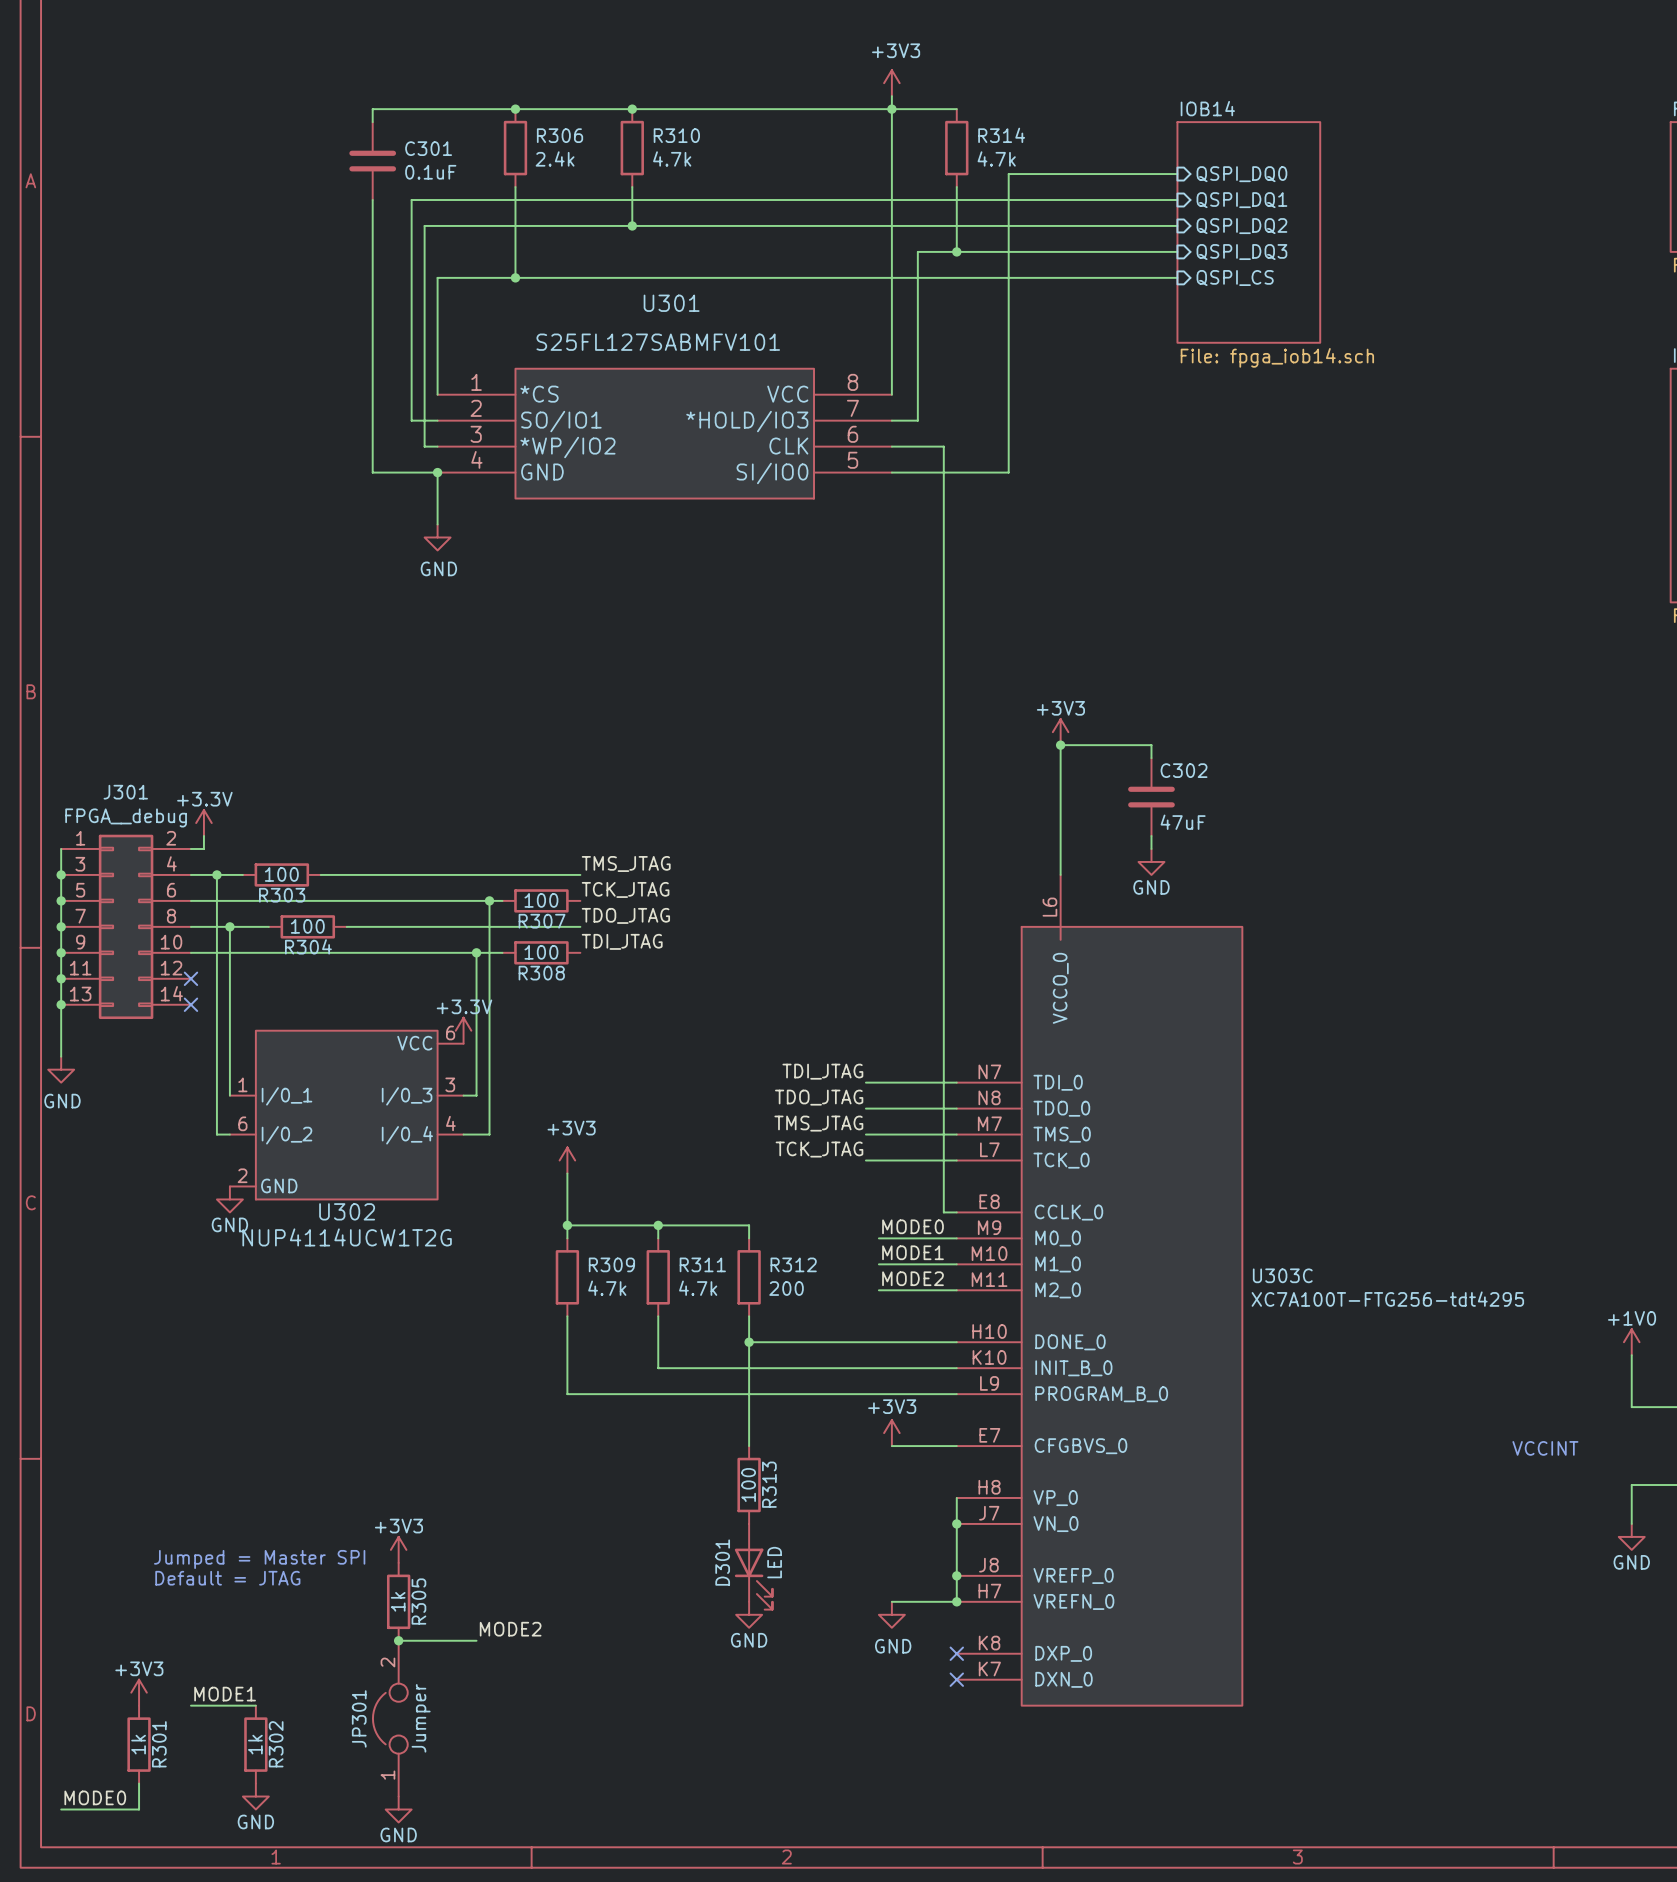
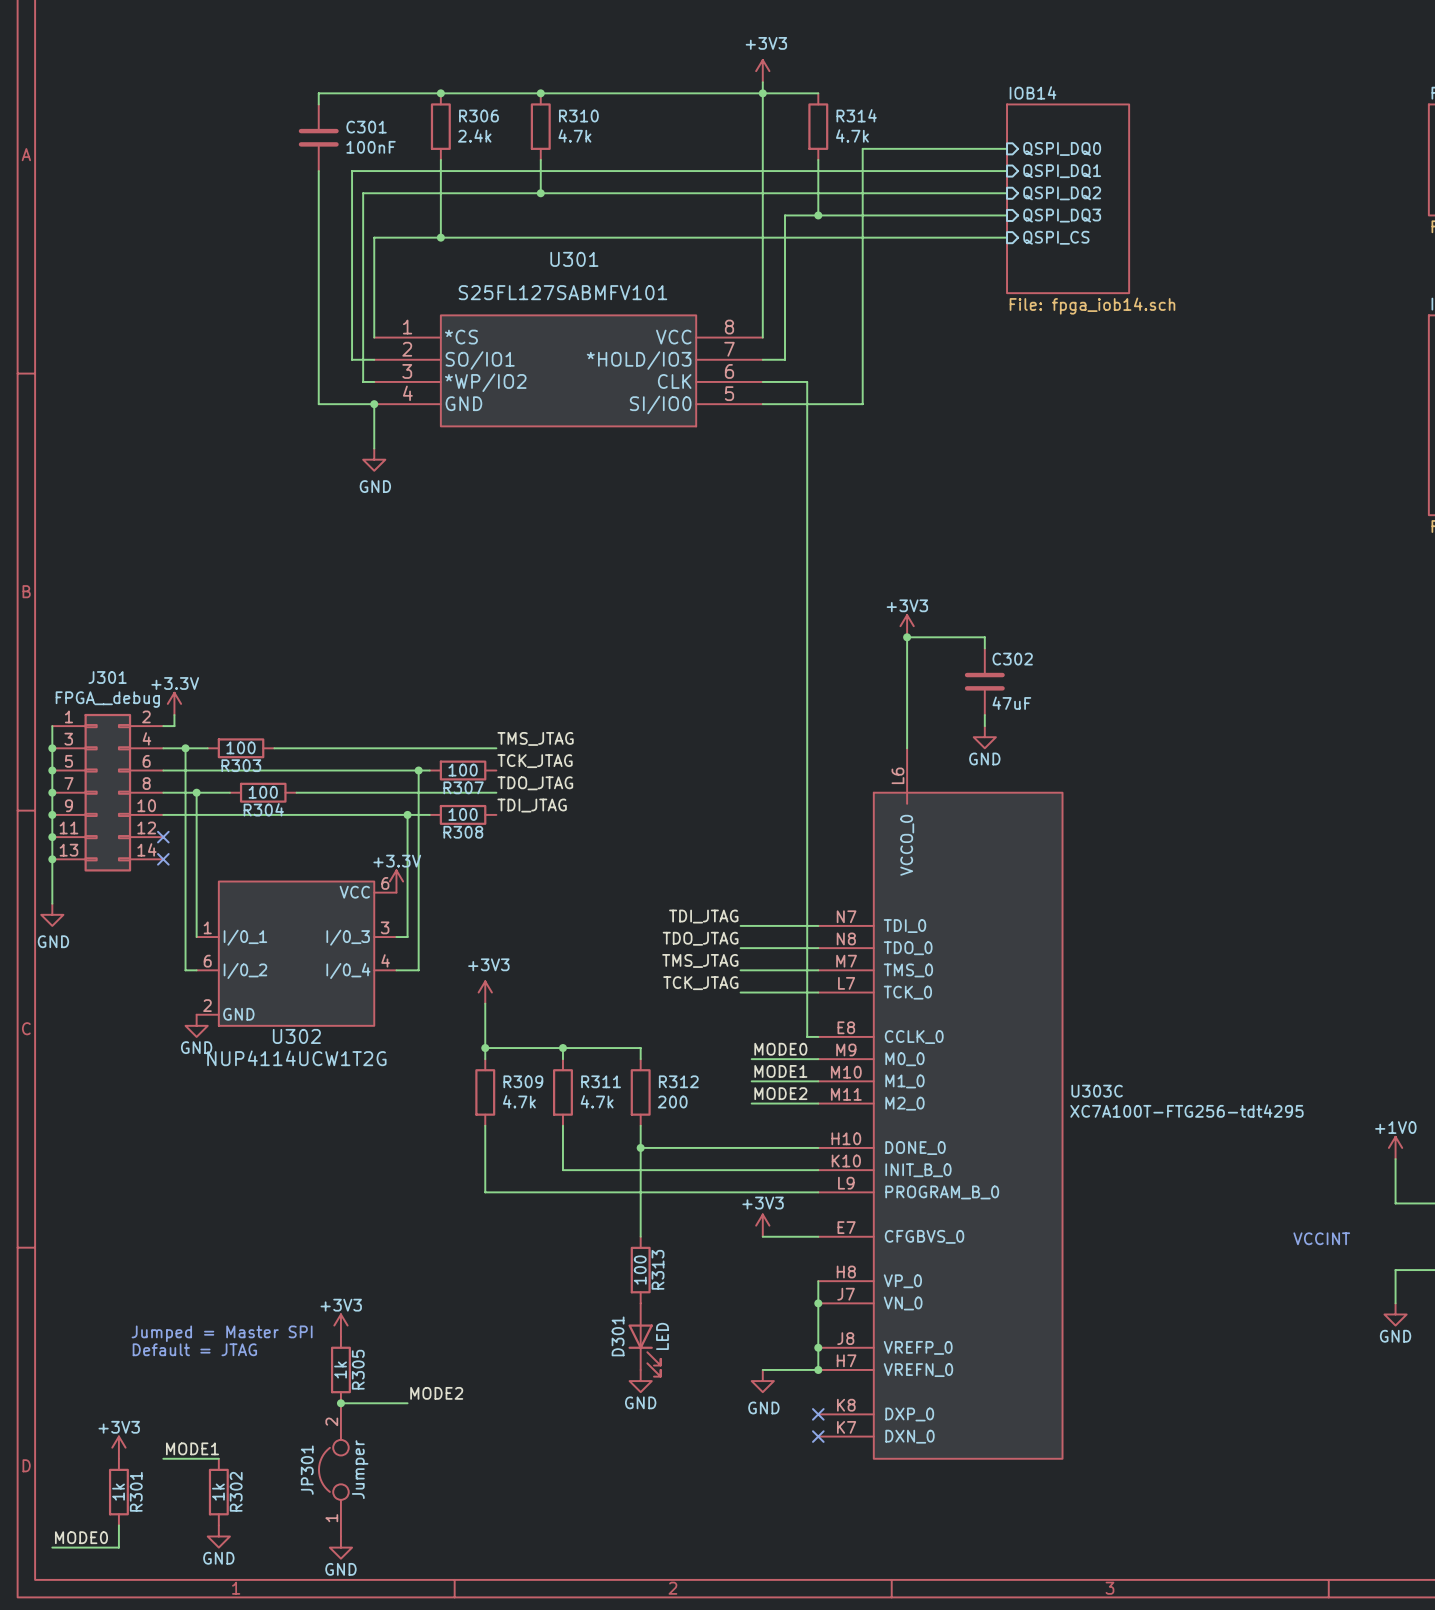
C301 value: 0.1uF (430, 172) -> 100nF (371, 147)

